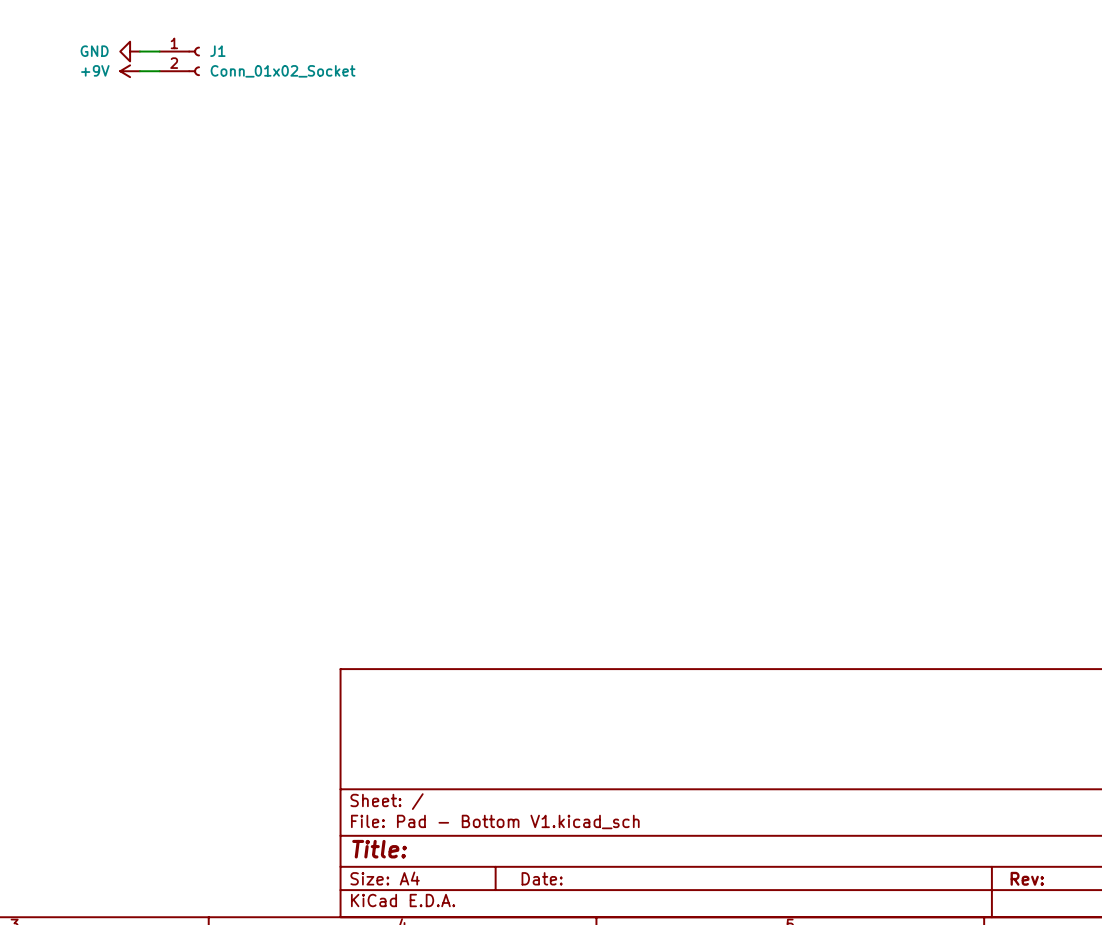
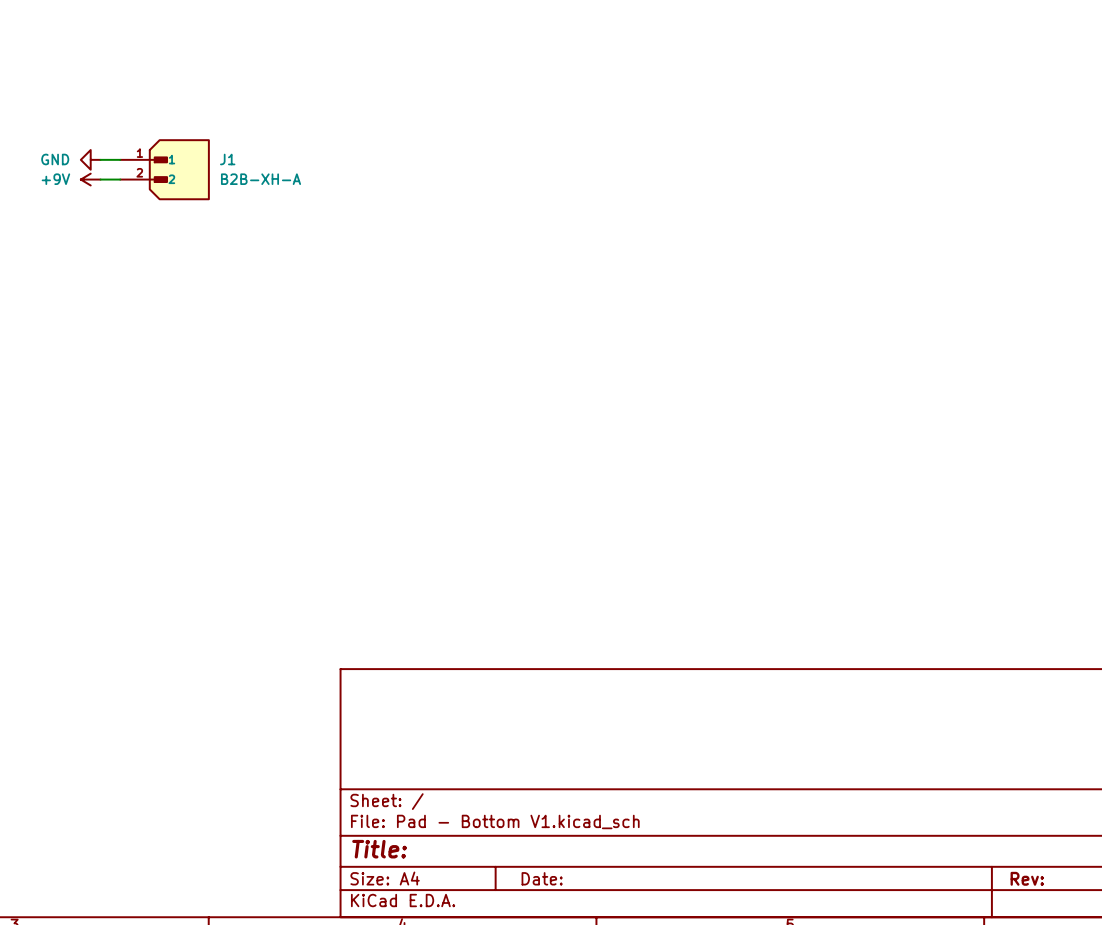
J1 symbol: [159, 47, 200, 76] -> [120, 139, 210, 201]
power symbol position: GND (130, 51) -> GND (90, 159)
wire: (139, 51) (159, 51) -> (100, 159) (120, 159)
J1 name position: J1 (217, 51) -> J1 (227, 159)
power symbol position: +9V (130, 71) -> +9V (90, 179)
wire: (139, 71) (159, 71) -> (100, 179) (120, 179)
J1 value: Conn_01x02_Socket (283, 71) -> B2B-XH-A (261, 179)

